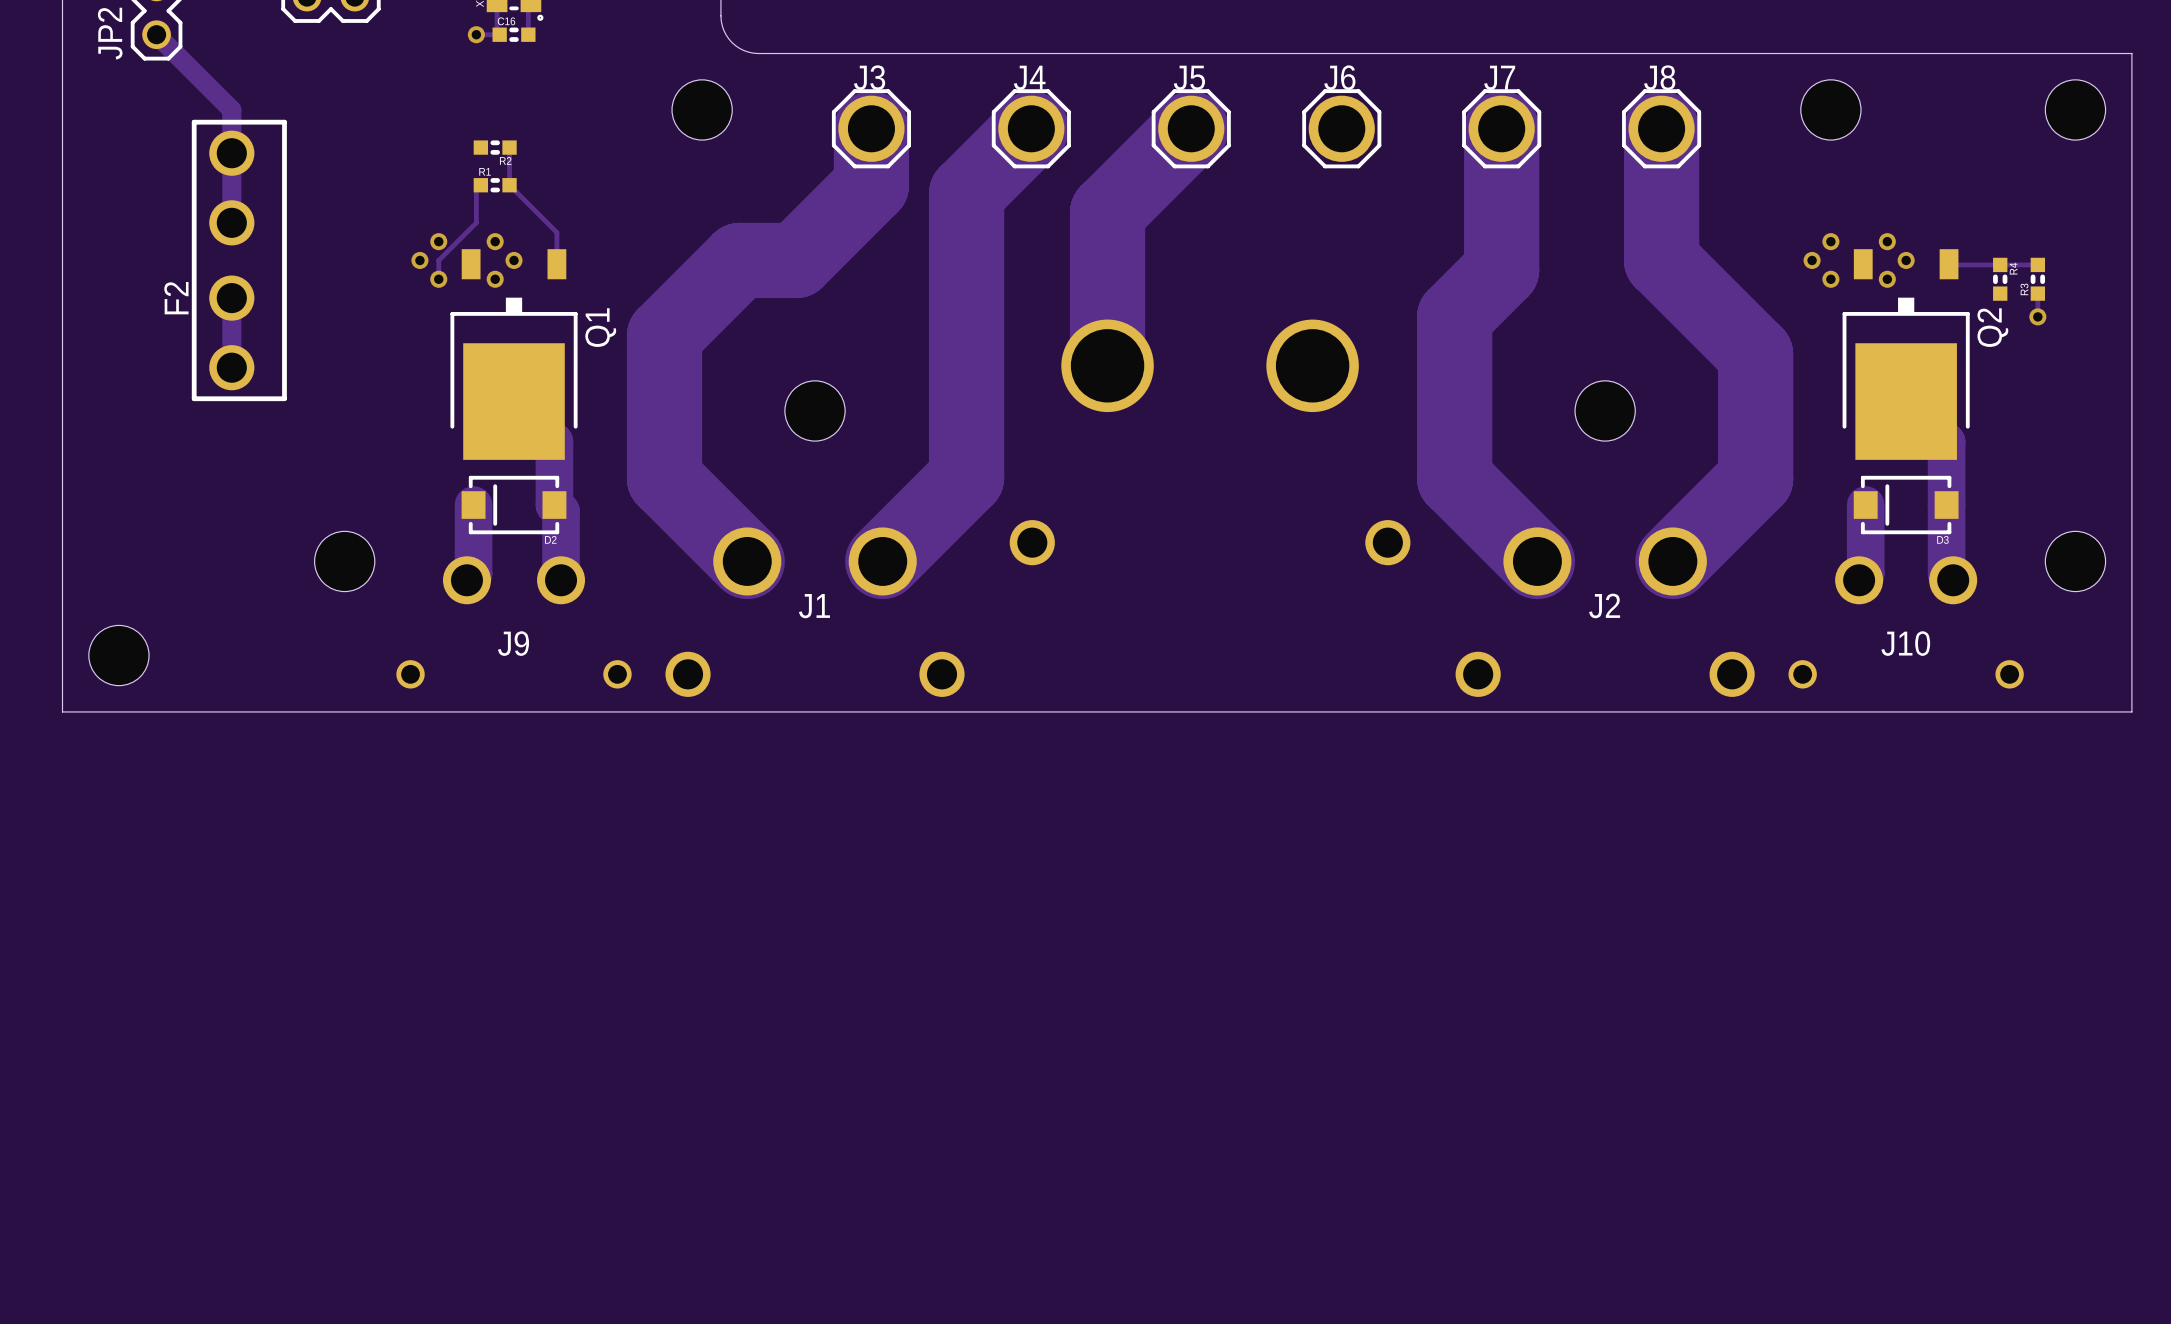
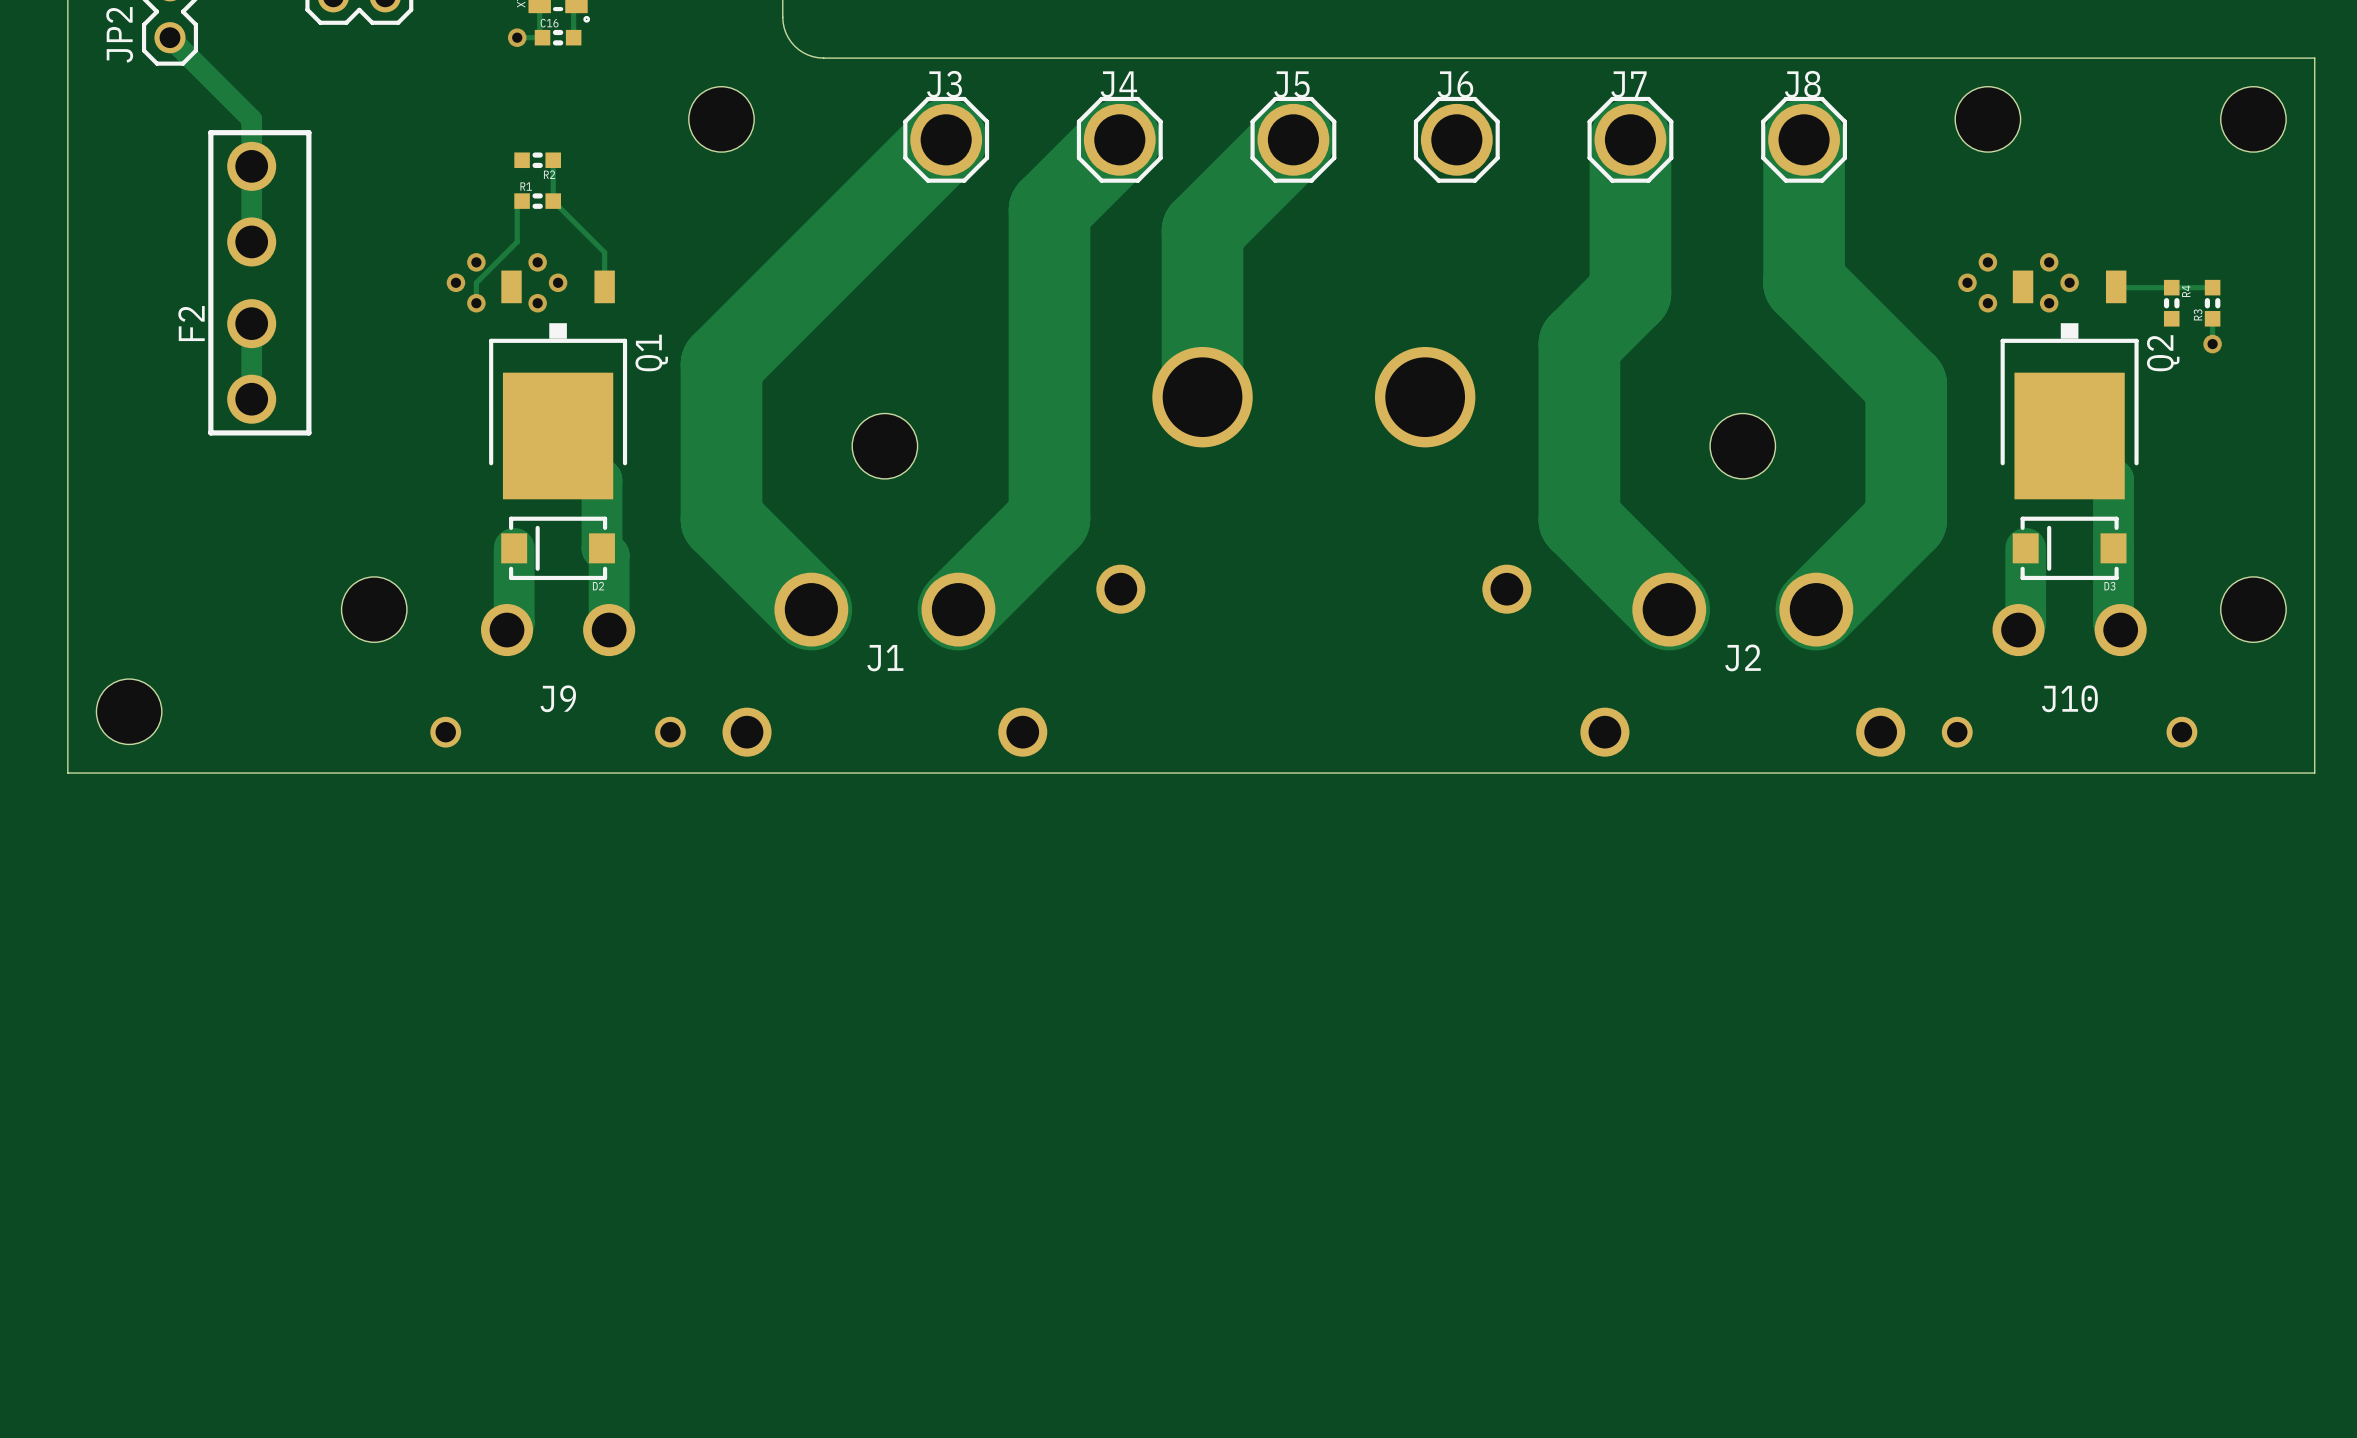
hole position: (702, 109) -> (721, 119)
track: (871, 128) (871, 185) (796, 260) (739, 260) -> (946, 139) (803, 282)

